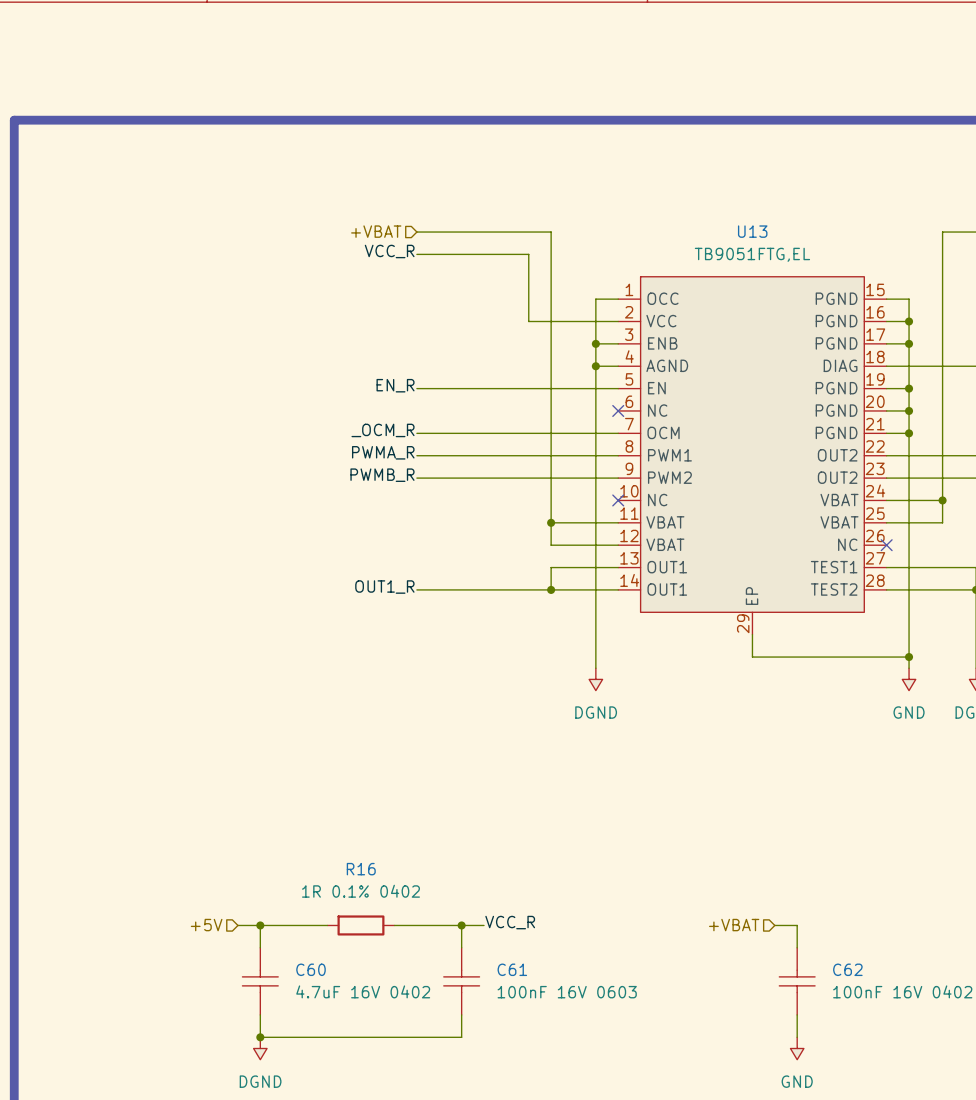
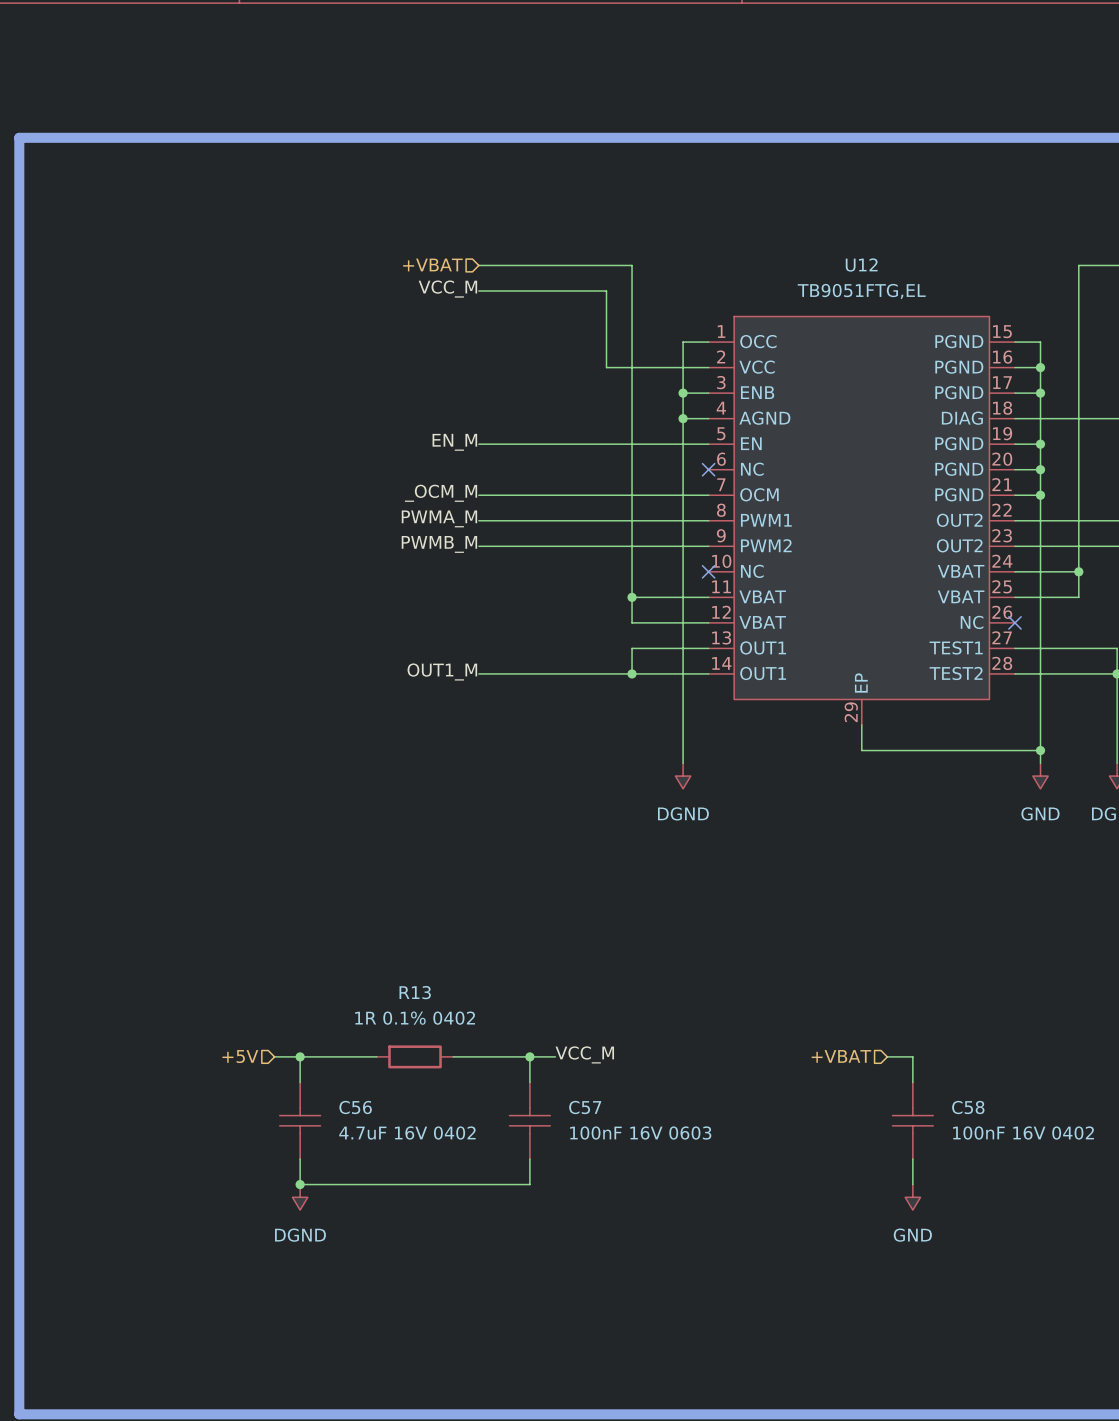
U13 name: U13 (752, 231) -> U12 (861, 265)
label: VCC_R (389, 251) -> VCC_M (447, 289)
label: EN_R (395, 385) -> EN_M (454, 442)
label: _OCM_R (383, 430) -> _OCM_M (441, 493)
label: PWMA_R (383, 452) -> PWMA_M (439, 518)
label: PWMB_R (382, 475) -> PWMB_M (439, 544)
label: OUT1_R (384, 587) -> OUT1_M (442, 671)
R16 name: R16 (361, 869) -> R13 (415, 992)
label: VCC_R (510, 922) -> VCC_M (584, 1054)
C60 name: C60 (311, 969) -> C56 (355, 1107)
C61 name: C61 (512, 969) -> C57 (585, 1107)
C62 name: C62 (847, 969) -> C58 (968, 1107)

